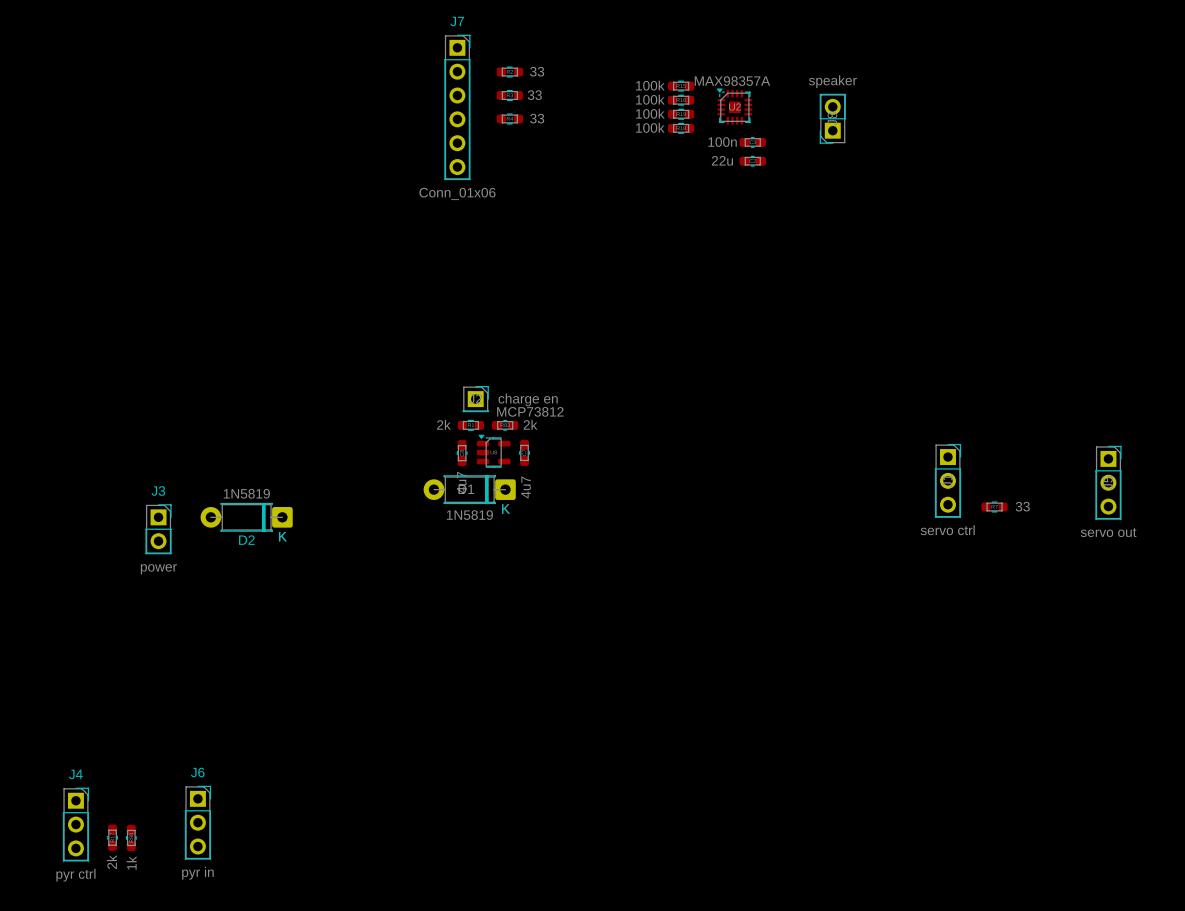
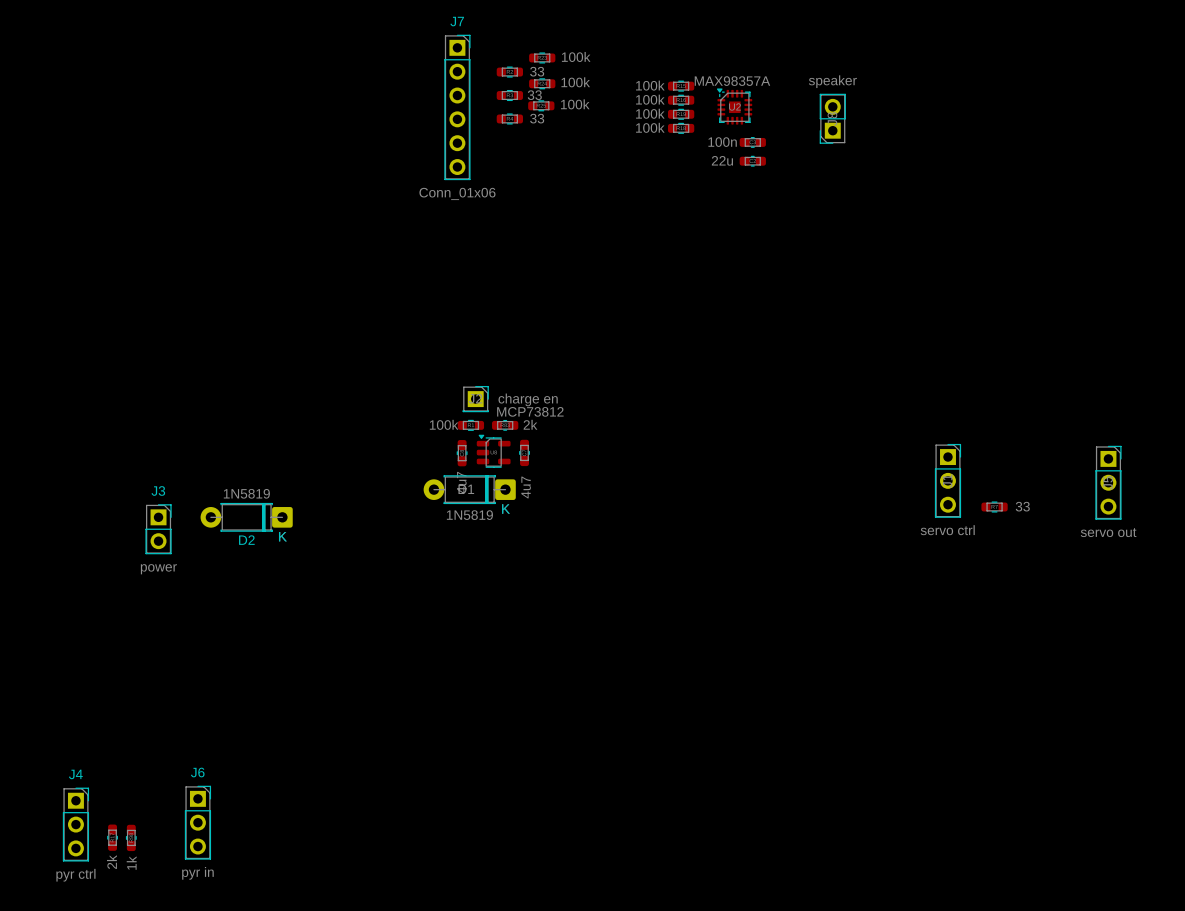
part: none -> 100k (542, 57)
part: none -> 100k (542, 83)
part: none -> 100k (541, 105)
part value: 2k (443, 424) -> 100k (444, 424)

